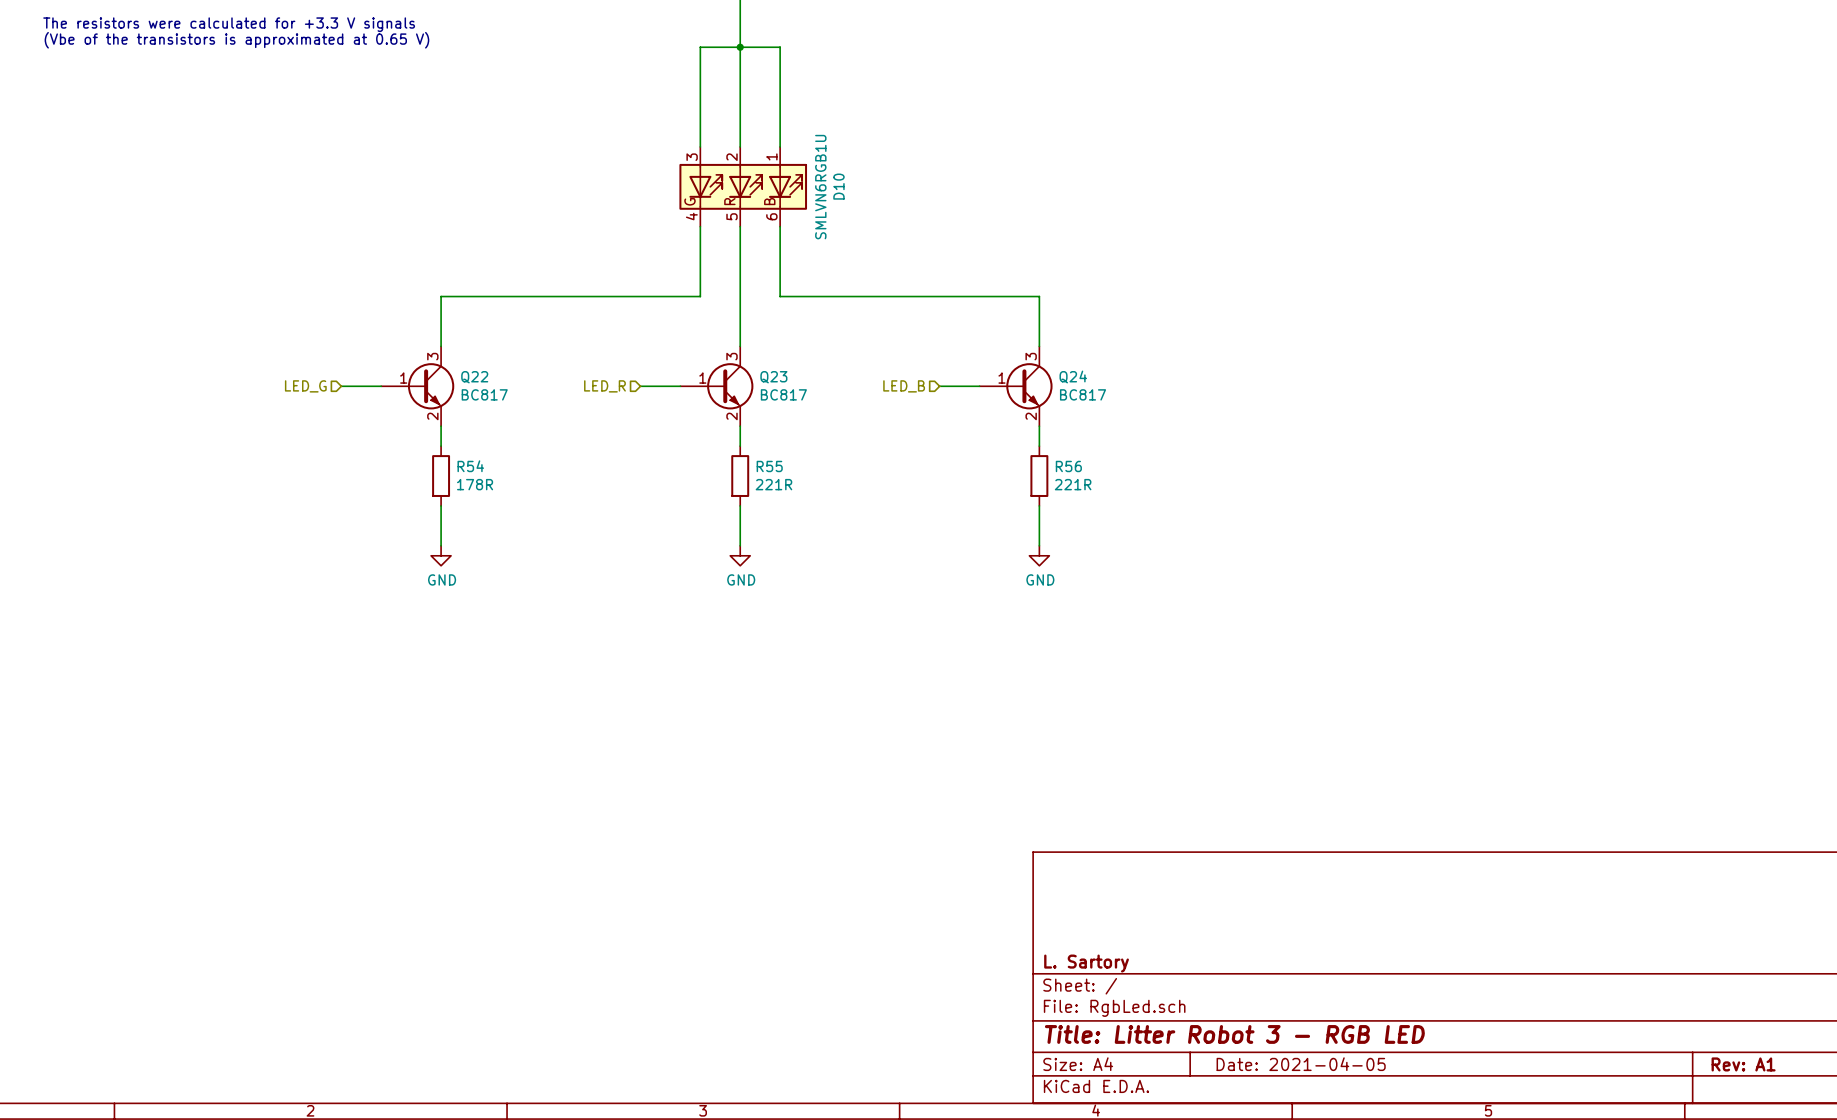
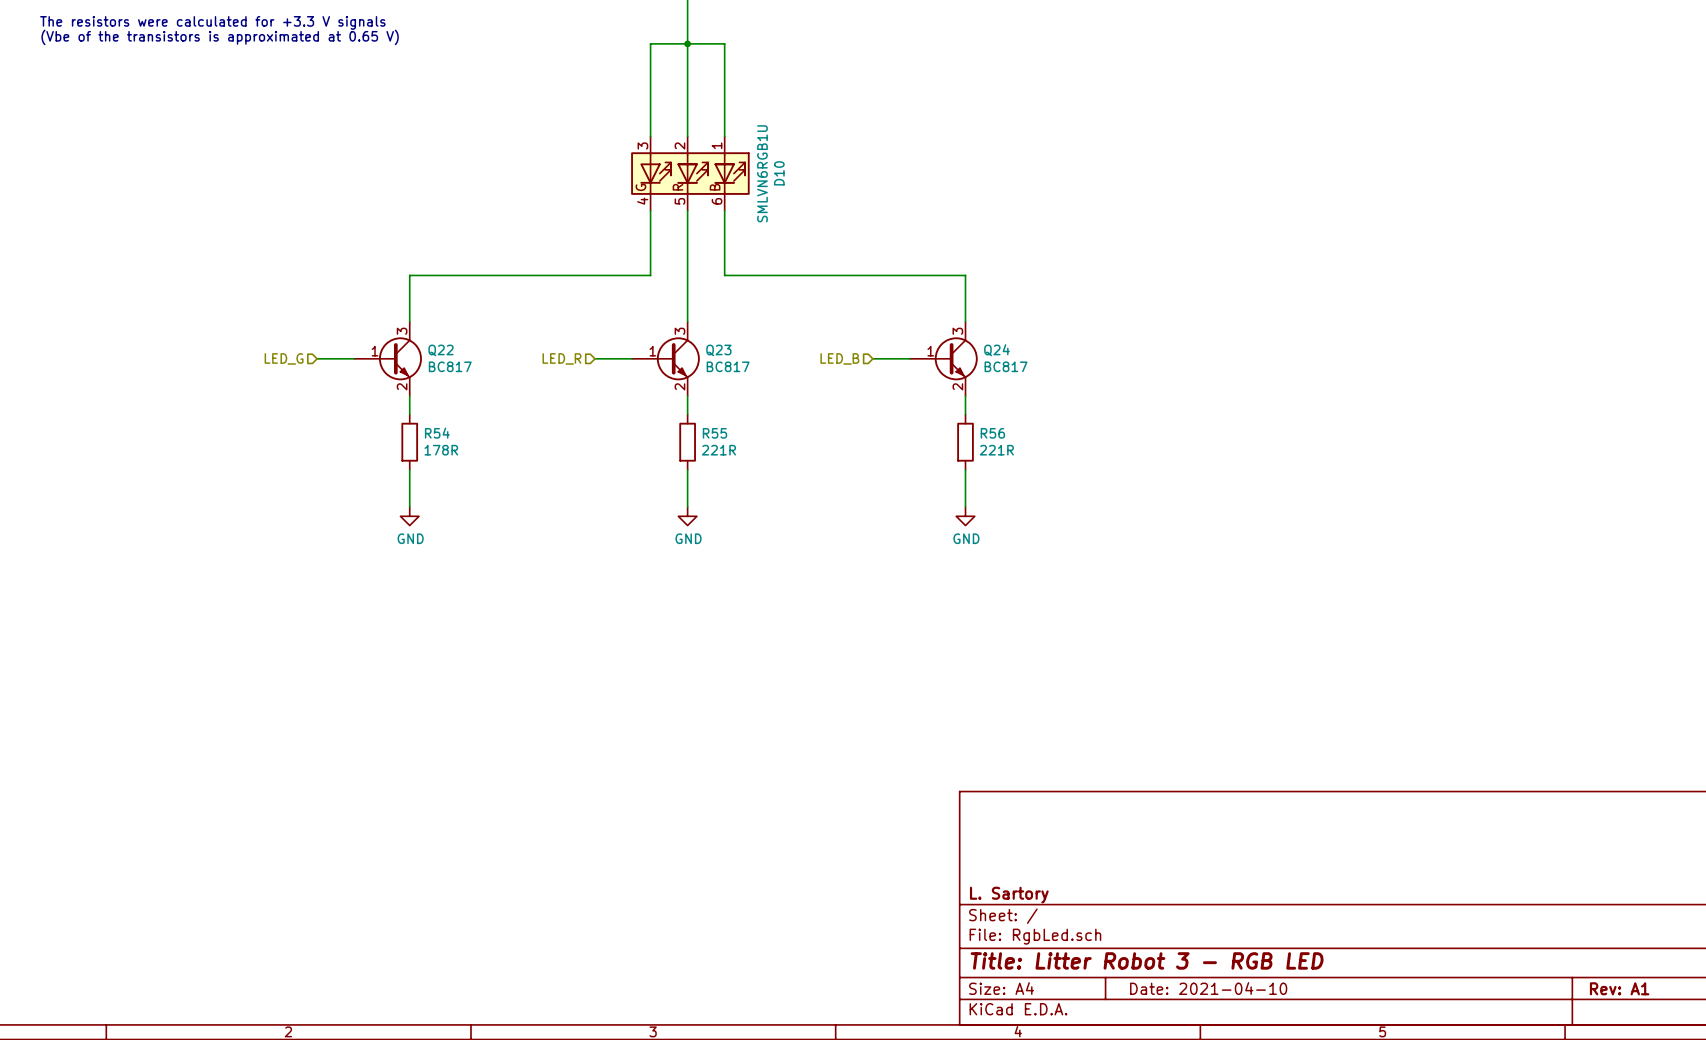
title block: Date: 2021-04-05 (1301, 1064) -> Date: 2021-04-10 (1208, 988)

